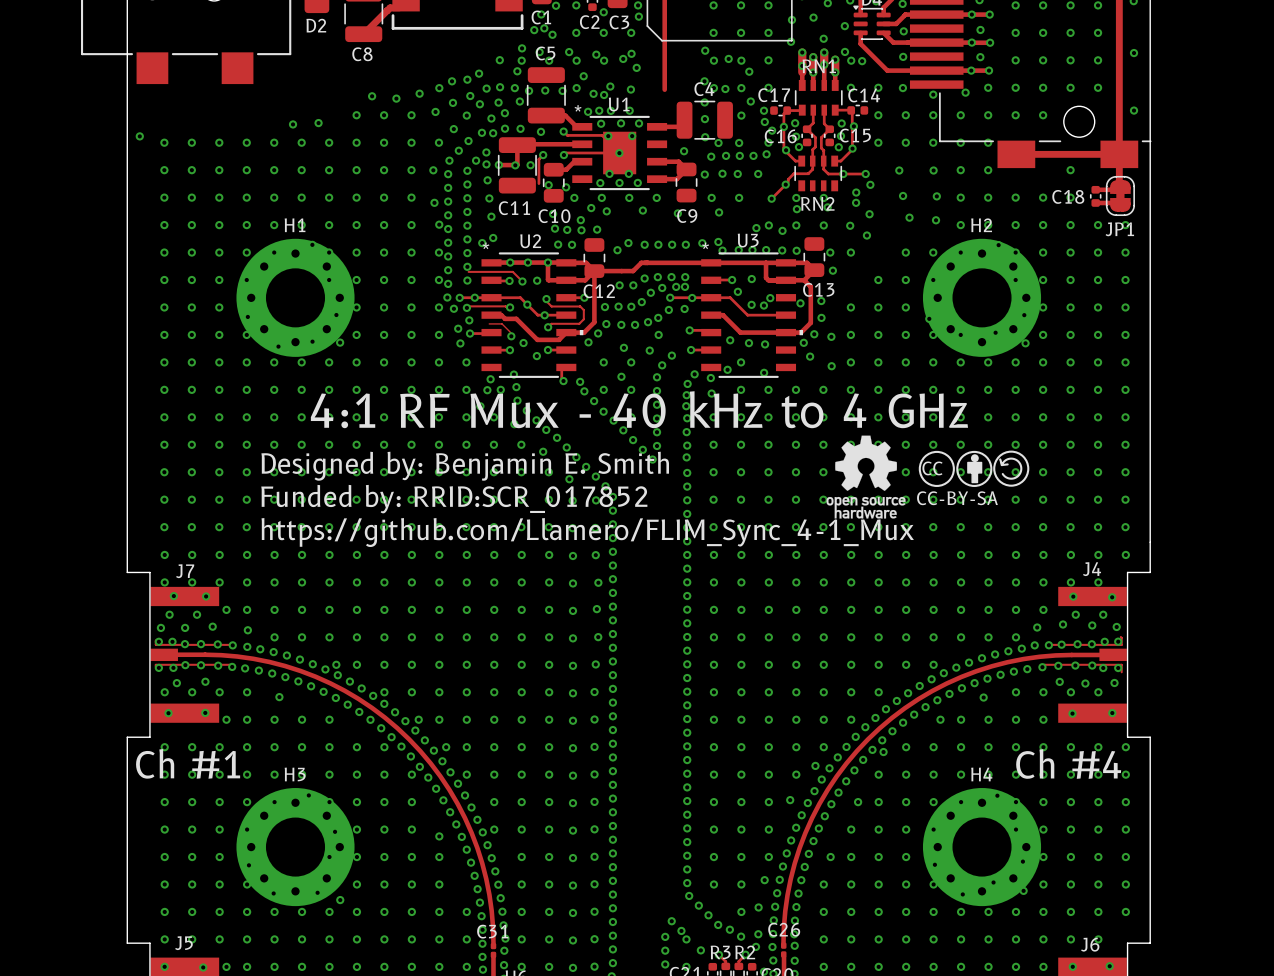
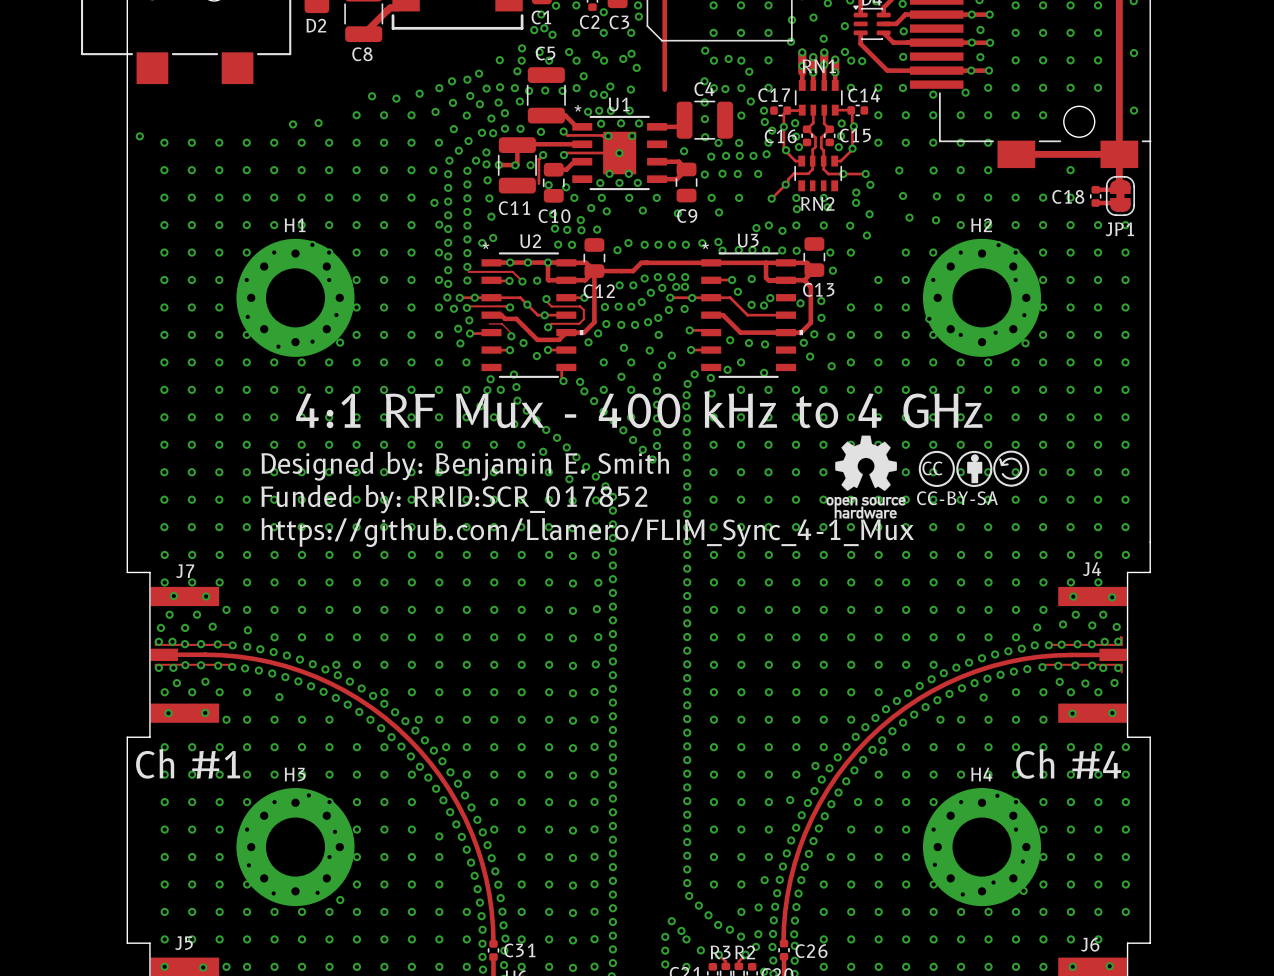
text: 4:1 RF Mux - 40 kHz to 4 GHz (639, 409) -> 4:1 RF Mux - 400 kHz to 4 GHz (639, 409)
C26 name position: C26 (784, 929) -> C26 (811, 951)
C31 name position: C31 (492, 931) -> C31 (519, 950)
C31 footprint: [490, 942, 497, 959] -> [487, 940, 500, 961]
C26 footprint: [781, 942, 787, 958] -> [778, 939, 790, 961]

